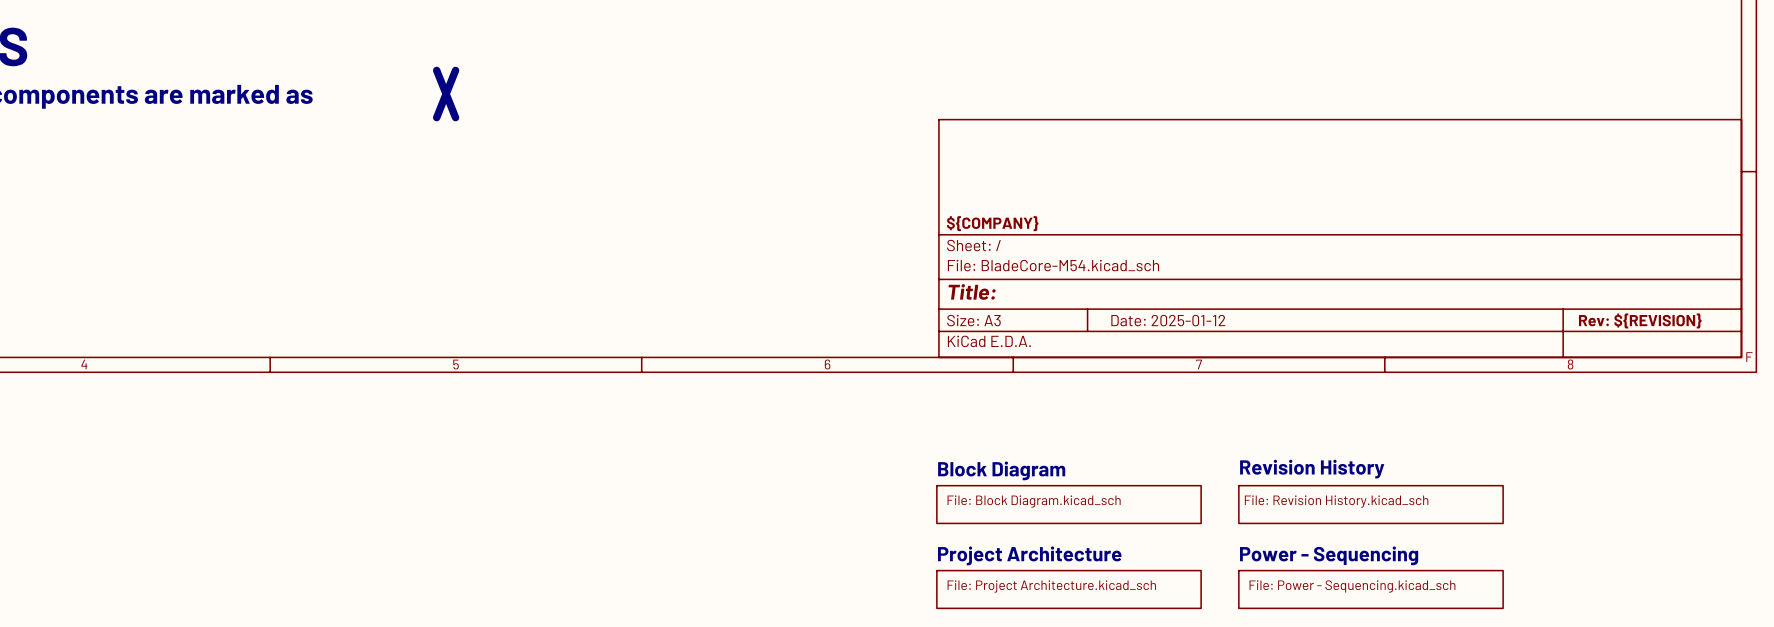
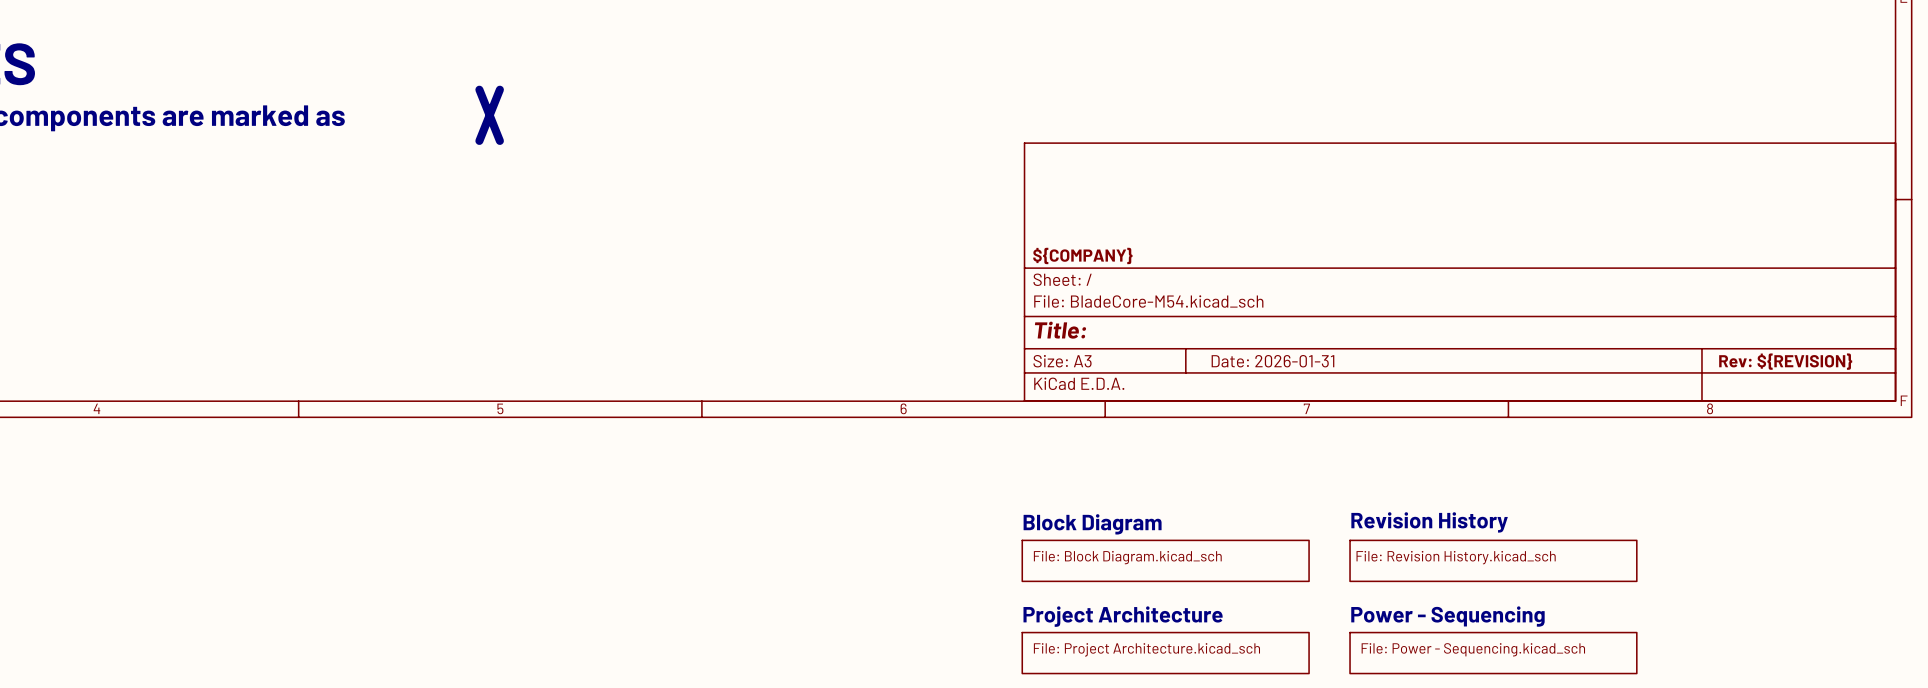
title block: Date: 2025-01-12 (1168, 320) -> Date: 2026-01-31 (1272, 361)

